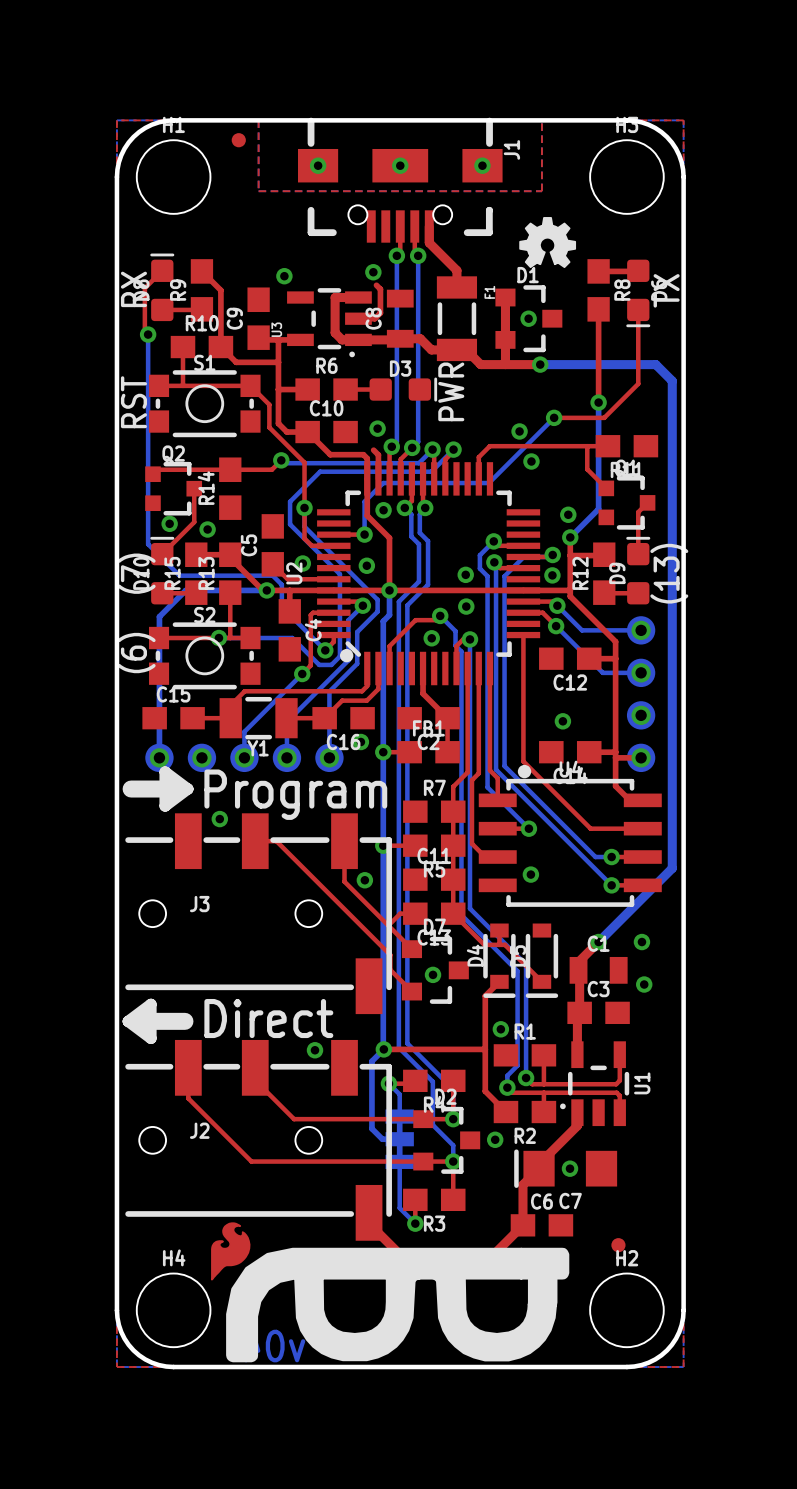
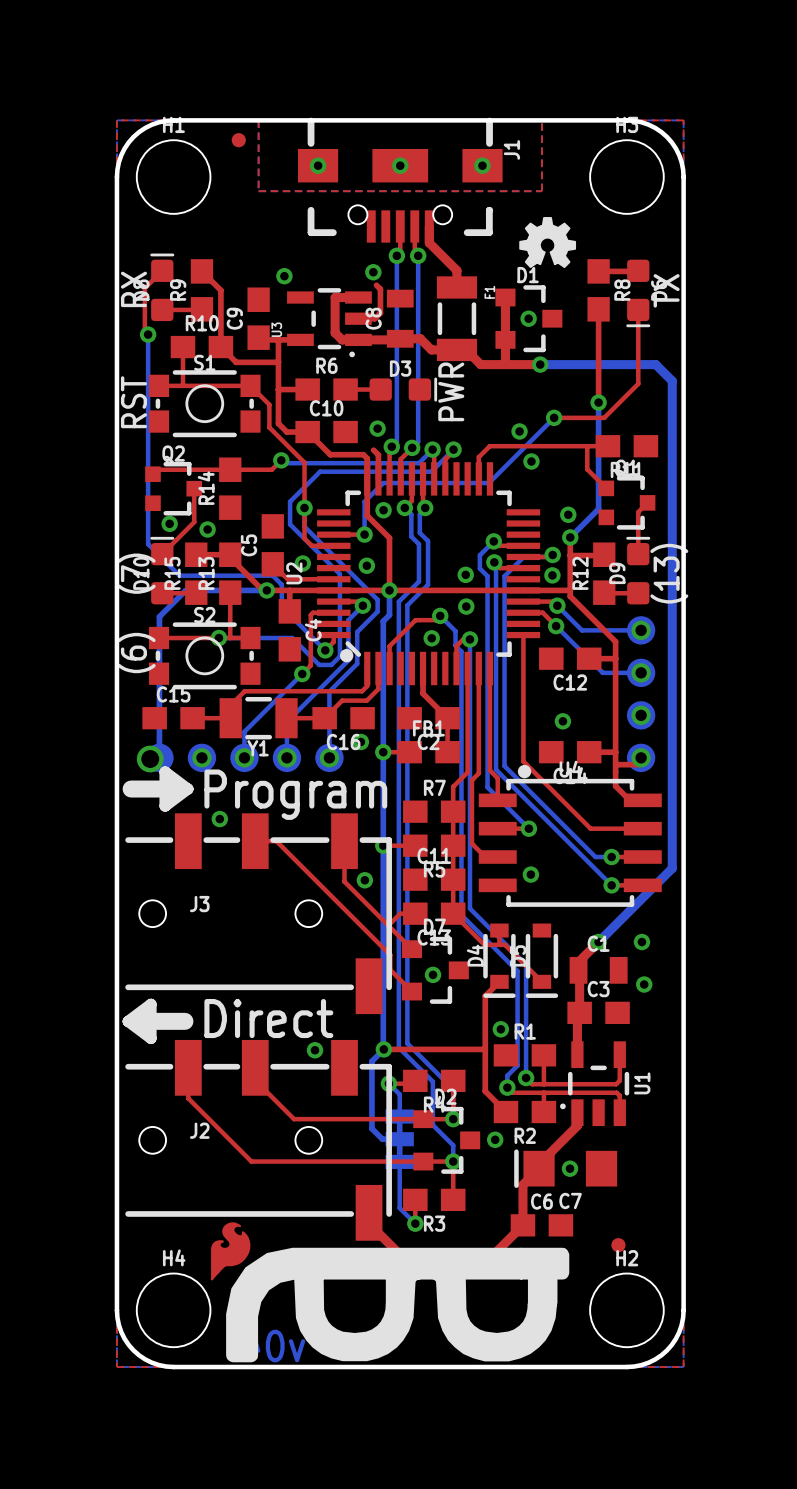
via size: [149, 748, 170, 768] -> [136, 745, 164, 773]
top track: (615, 757) (641, 757) -> none
top track: none -> (638, 764) (615, 764) (615, 772)

